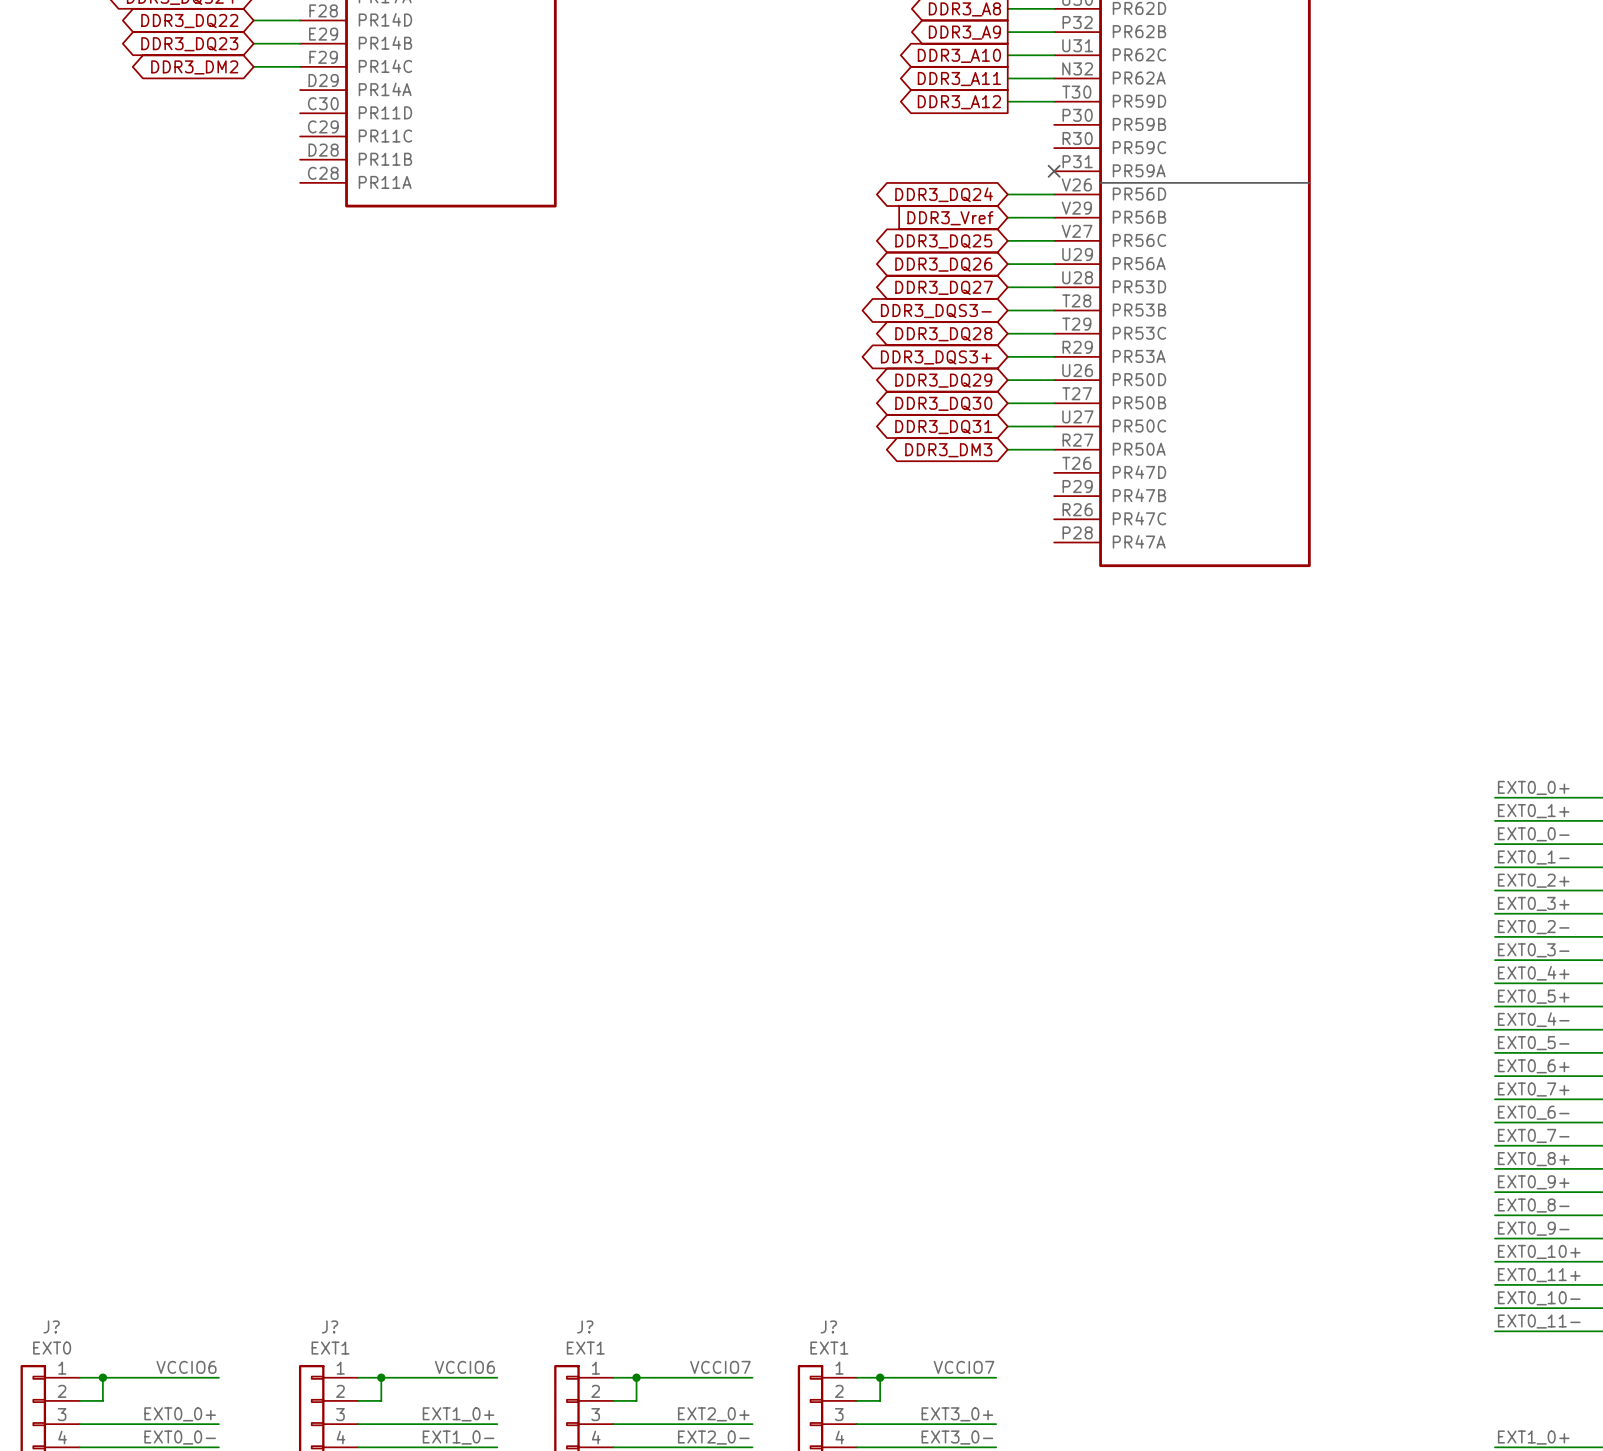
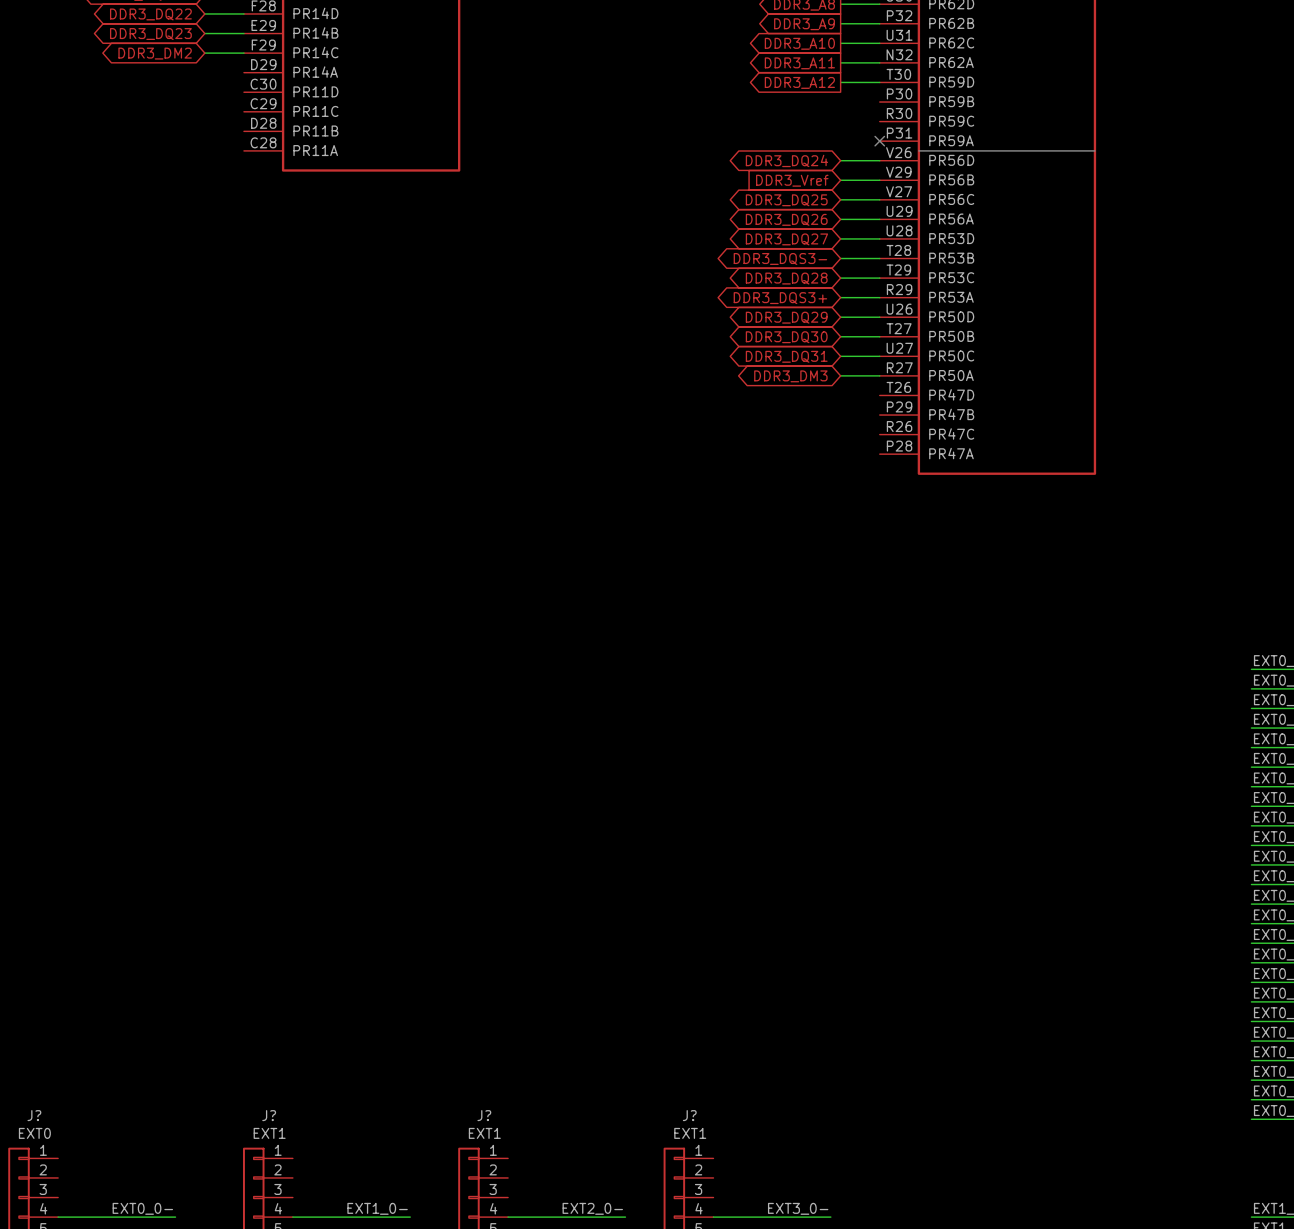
label: VCCIO6 (186, 1367) -> none
label: VCCIO6 (464, 1367) -> none
label: VCCIO7 (720, 1367) -> none
label: VCCIO7 (964, 1367) -> none
wire: (79, 1377) (218, 1377) -> none
wire: (102, 1377) (102, 1400) (79, 1400) -> none
junction: (102, 1377) -> none
wire: (358, 1377) (497, 1377) -> none
wire: (381, 1377) (381, 1400) (358, 1400) -> none
junction: (381, 1377) -> none
wire: (613, 1377) (752, 1377) -> none
wire: (636, 1377) (636, 1400) (613, 1400) -> none
junction: (636, 1377) -> none
wire: (856, 1377) (996, 1377) -> none
wire: (880, 1377) (880, 1400) (856, 1400) -> none
junction: (880, 1377) -> none
label: EXT0_0+ (180, 1414) -> none
label: EXT1_0+ (458, 1414) -> none
label: EXT2_0+ (713, 1414) -> none
label: EXT3_0+ (957, 1414) -> none
wire: (79, 1424) (218, 1424) -> none
wire: (358, 1424) (497, 1424) -> none
wire: (613, 1424) (752, 1424) -> none
wire: (856, 1424) (996, 1424) -> none

